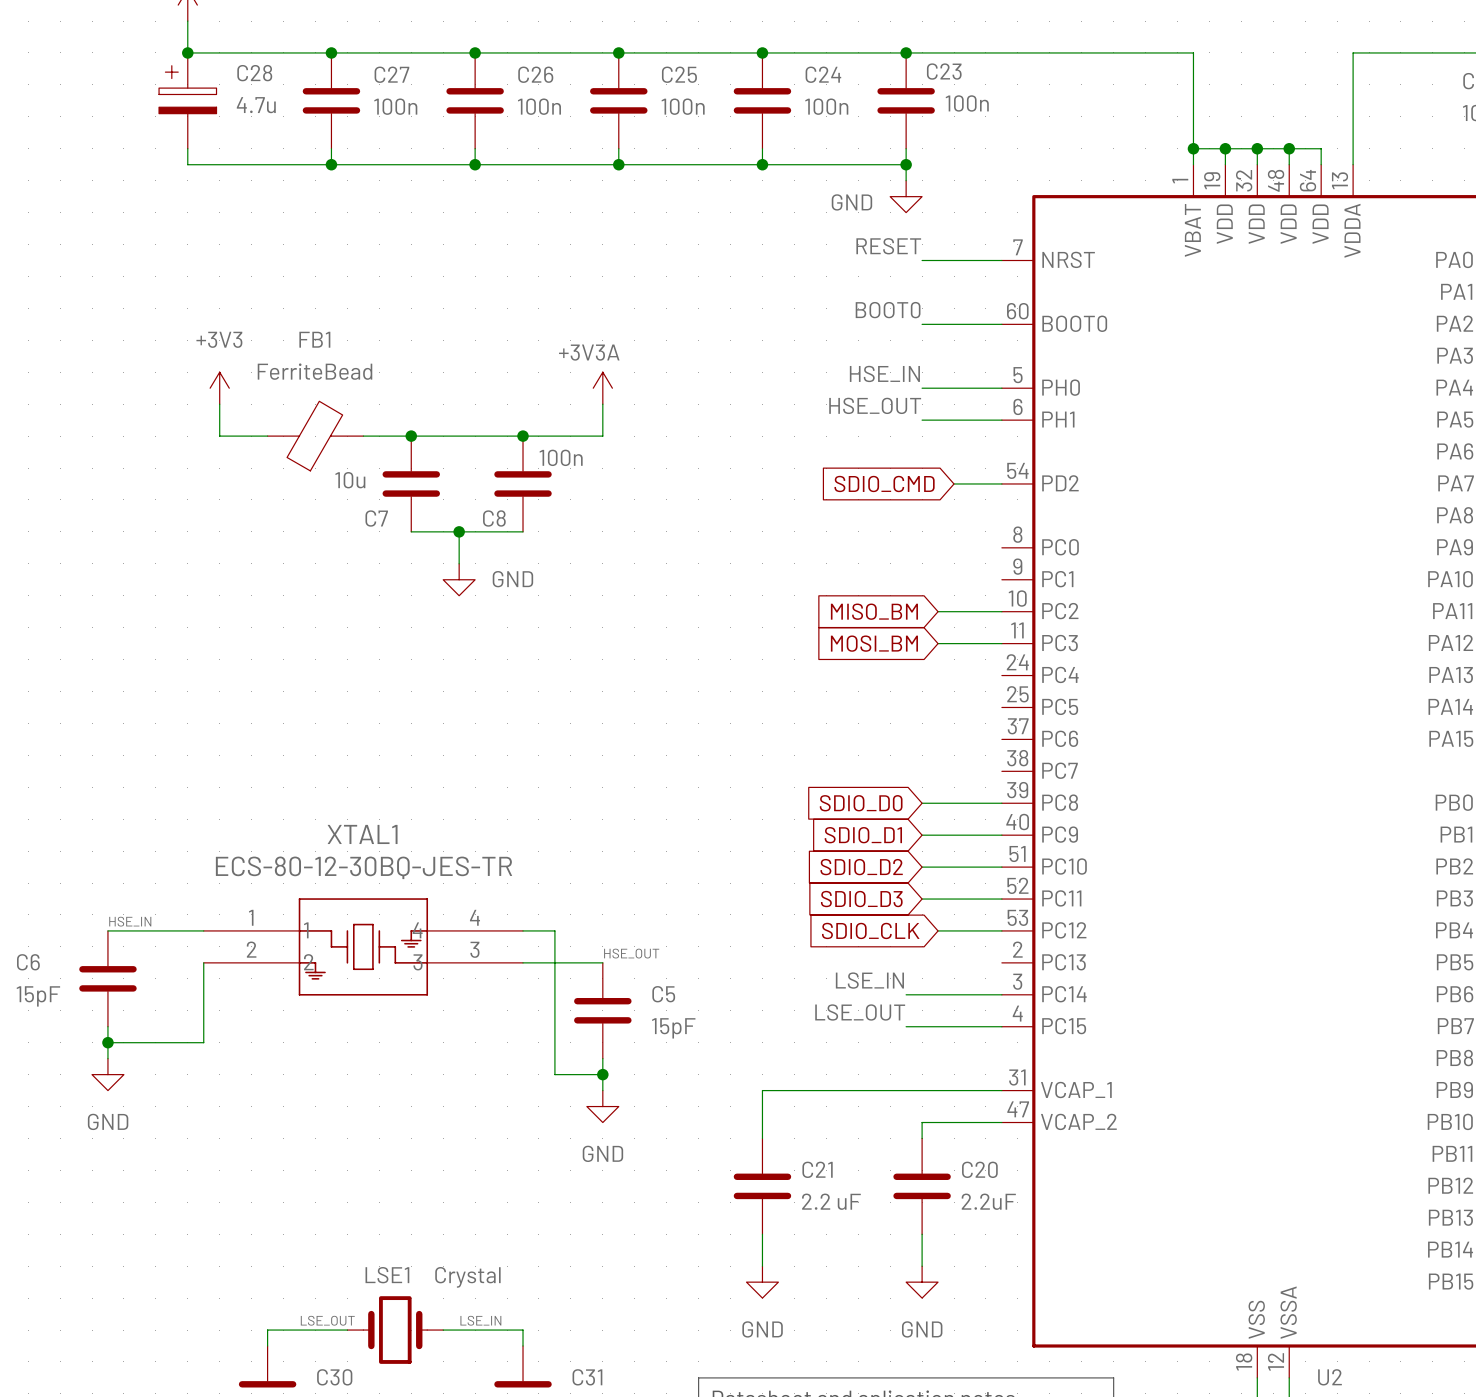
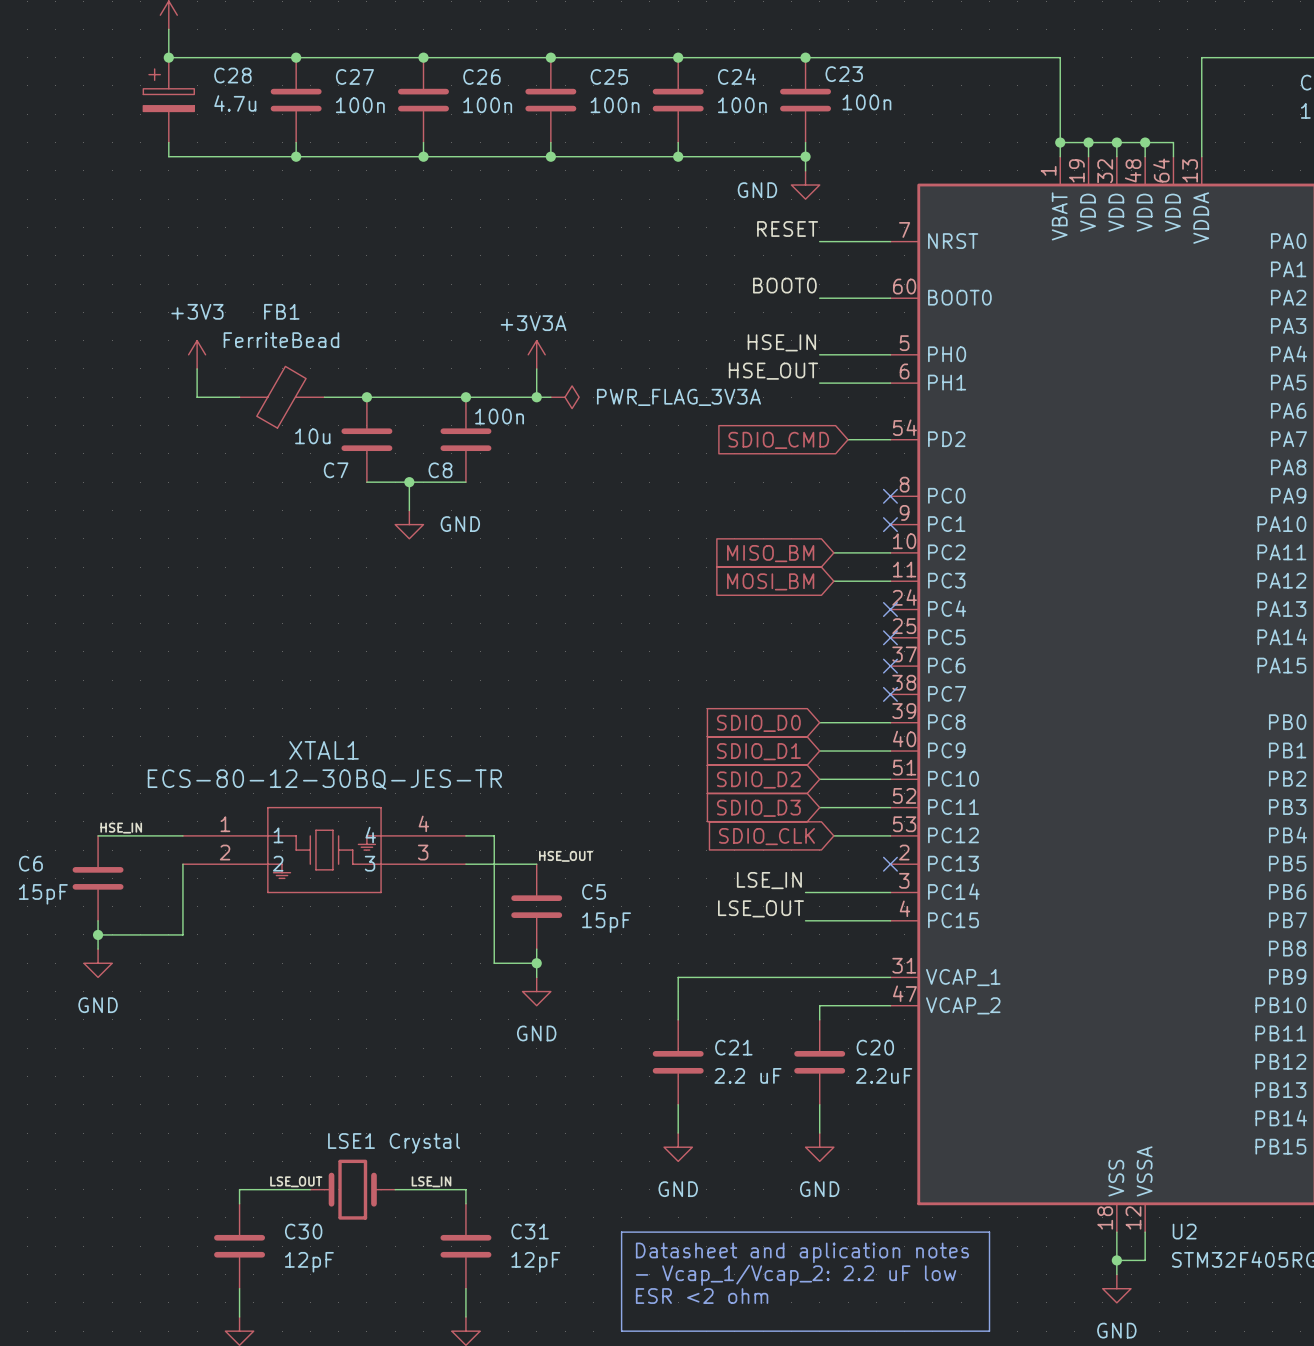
wire: none -> (536, 397) (550, 397)
junction: none -> (536, 397)
power symbol: none -> PWR_FLAG_3V3A (565, 397)
no-connect mark: none -> (890, 496)
no-connect mark: none -> (890, 524)
no-connect mark: none -> (890, 609)
no-connect mark: none -> (890, 637)
no-connect mark: none -> (890, 666)
no-connect mark: none -> (890, 694)
no-connect mark: none -> (890, 864)

